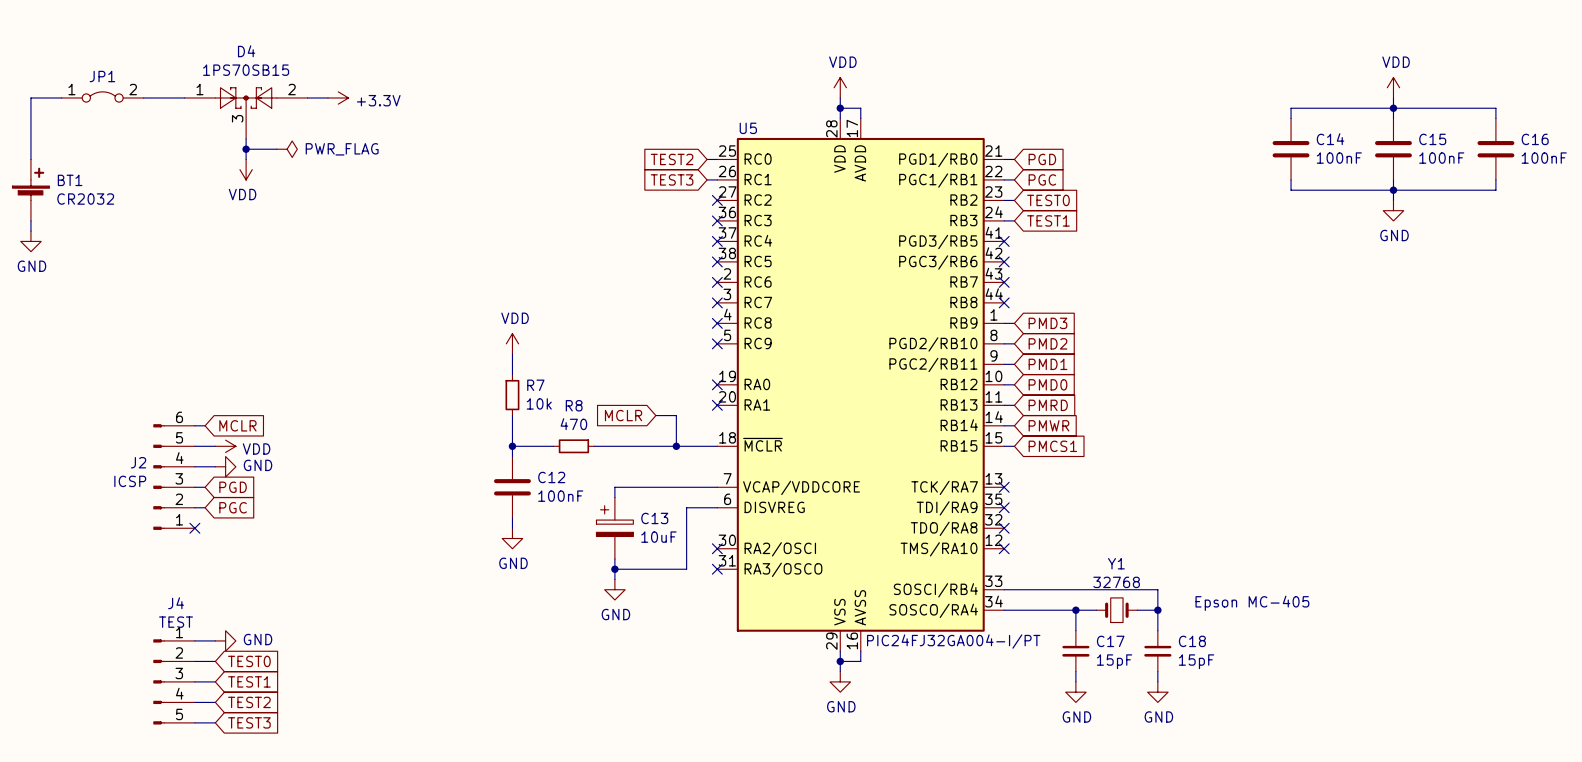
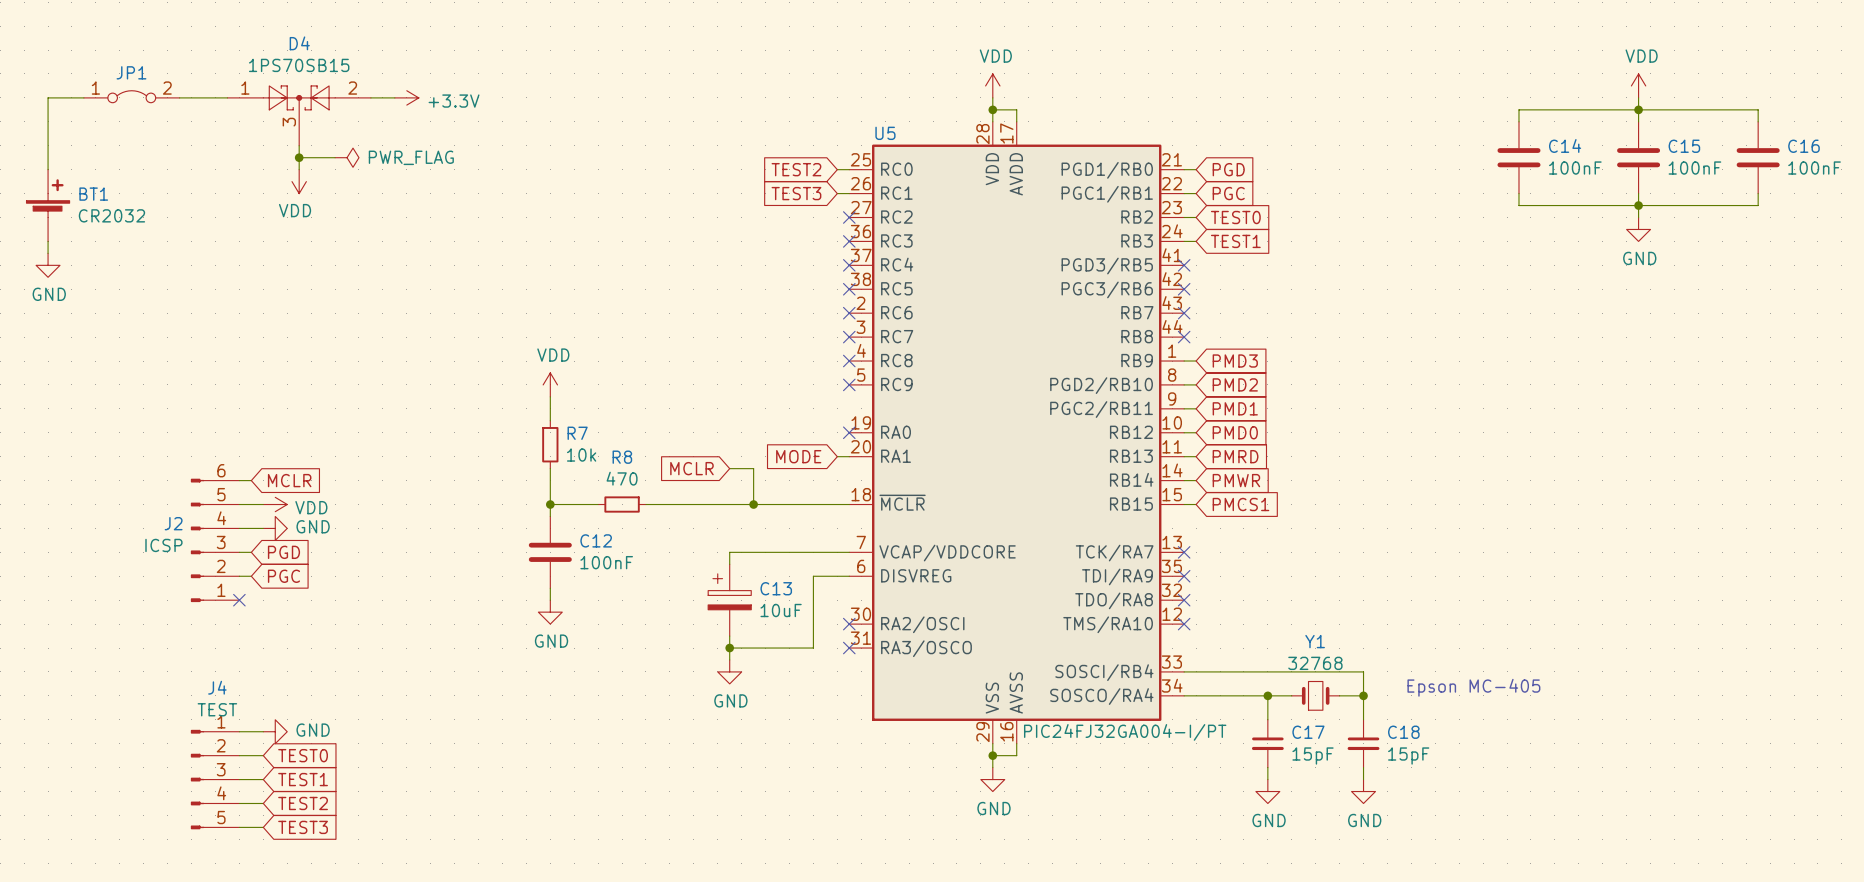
power symbol position: VDD (512, 343) -> VDD (550, 384)
wire: (512, 354) (512, 374) -> (550, 396) (550, 420)
R7 position: (512, 395) -> (550, 444)
global label: none -> MODE (798, 456)
wire: none -> (837, 456) (849, 456)
no-connect mark: (717, 405) -> none
wire: (512, 415) (512, 456) -> (550, 468) (550, 516)
global label position: MCLR (623, 415) -> MCLR (691, 468)
wire: (655, 415) (676, 415) (676, 446) -> (729, 468) (753, 468) (753, 504)
wire: none -> (550, 504) (598, 504)
junction: none -> (550, 504)
wire: (512, 446) (543, 446) -> none
junction: (512, 446) -> none
wire: none -> (657, 504) (705, 504)
R8 position: (573, 446) -> (622, 504)
junction position: (676, 446) -> (753, 504)
C12 position: (512, 487) -> (550, 552)
wire: (512, 518) (512, 528) -> (550, 588) (550, 600)
power symbol position: GND (512, 538) -> GND (550, 612)

